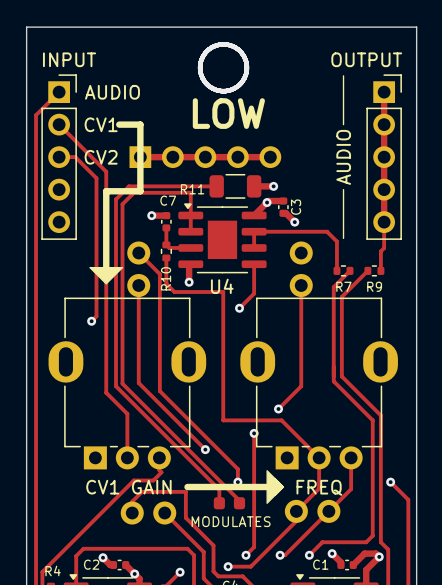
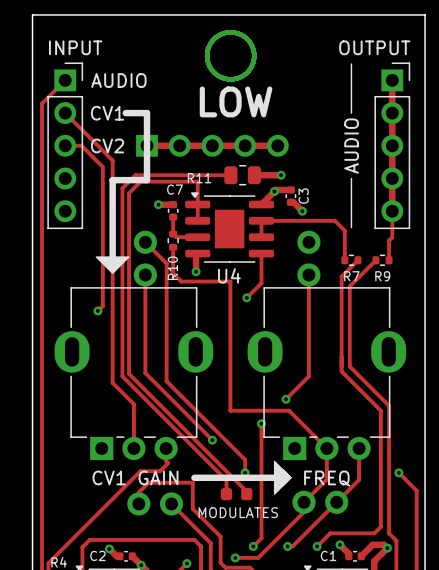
R11 footprint: [209, 173, 262, 199] -> [224, 164, 262, 186]

